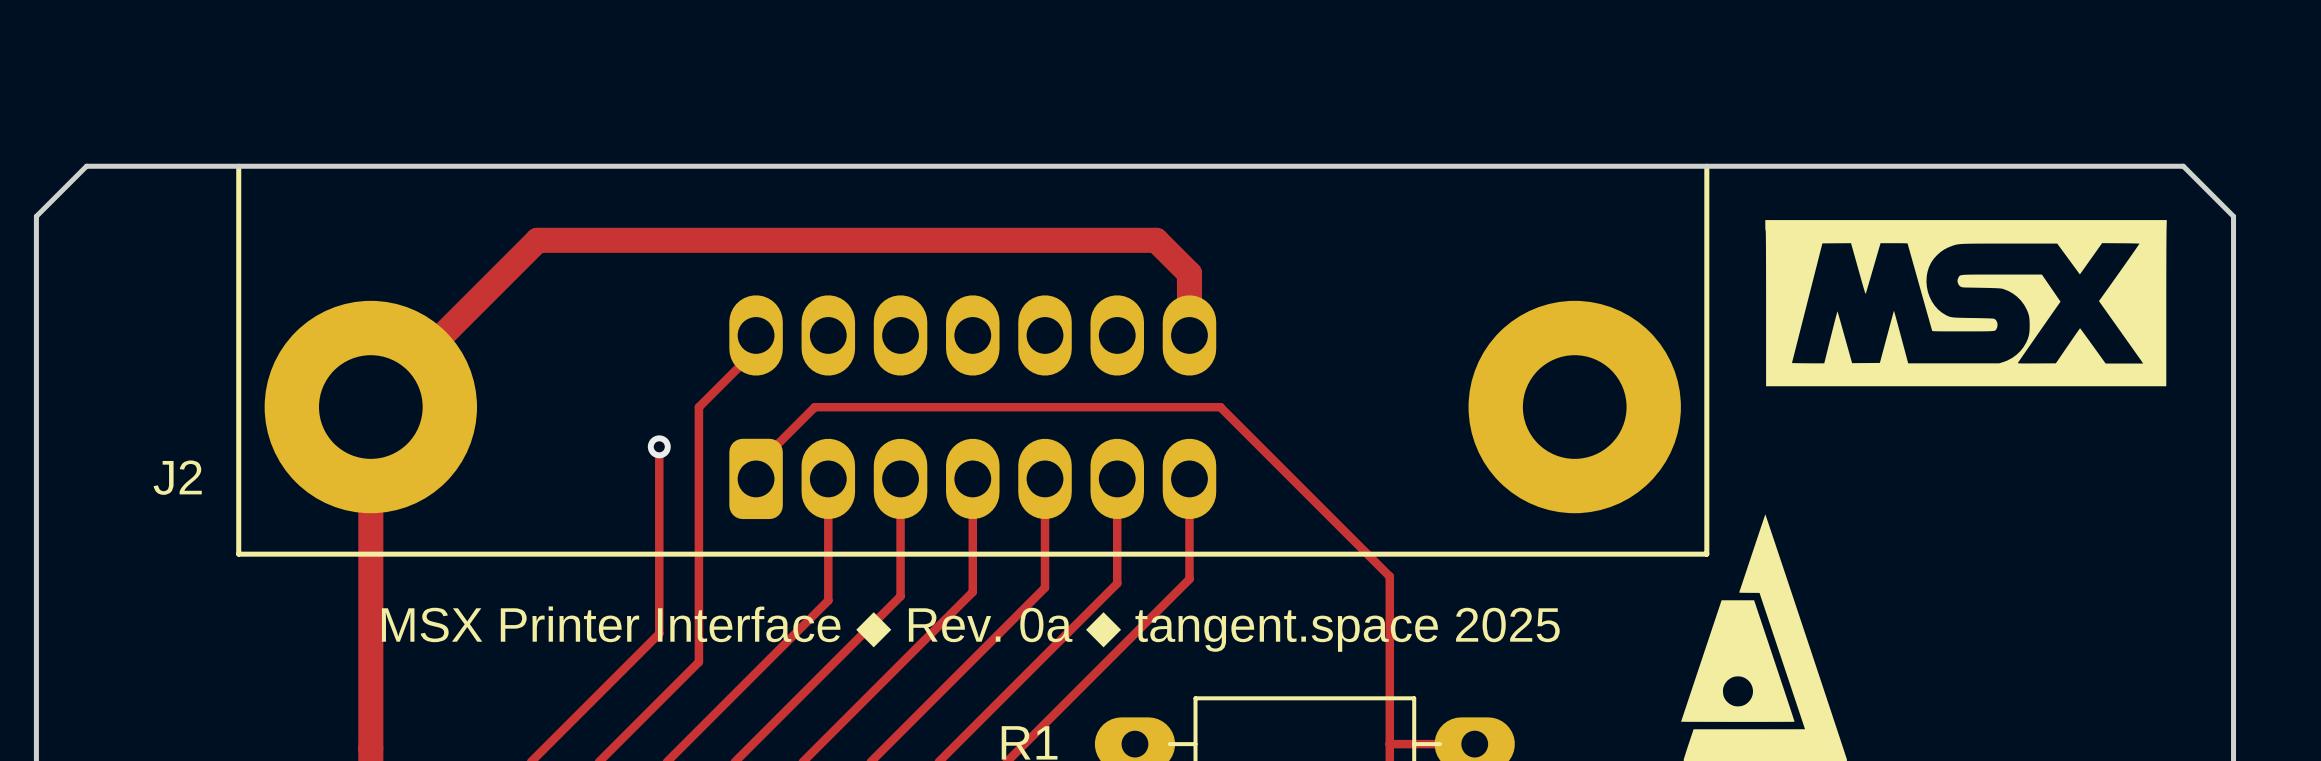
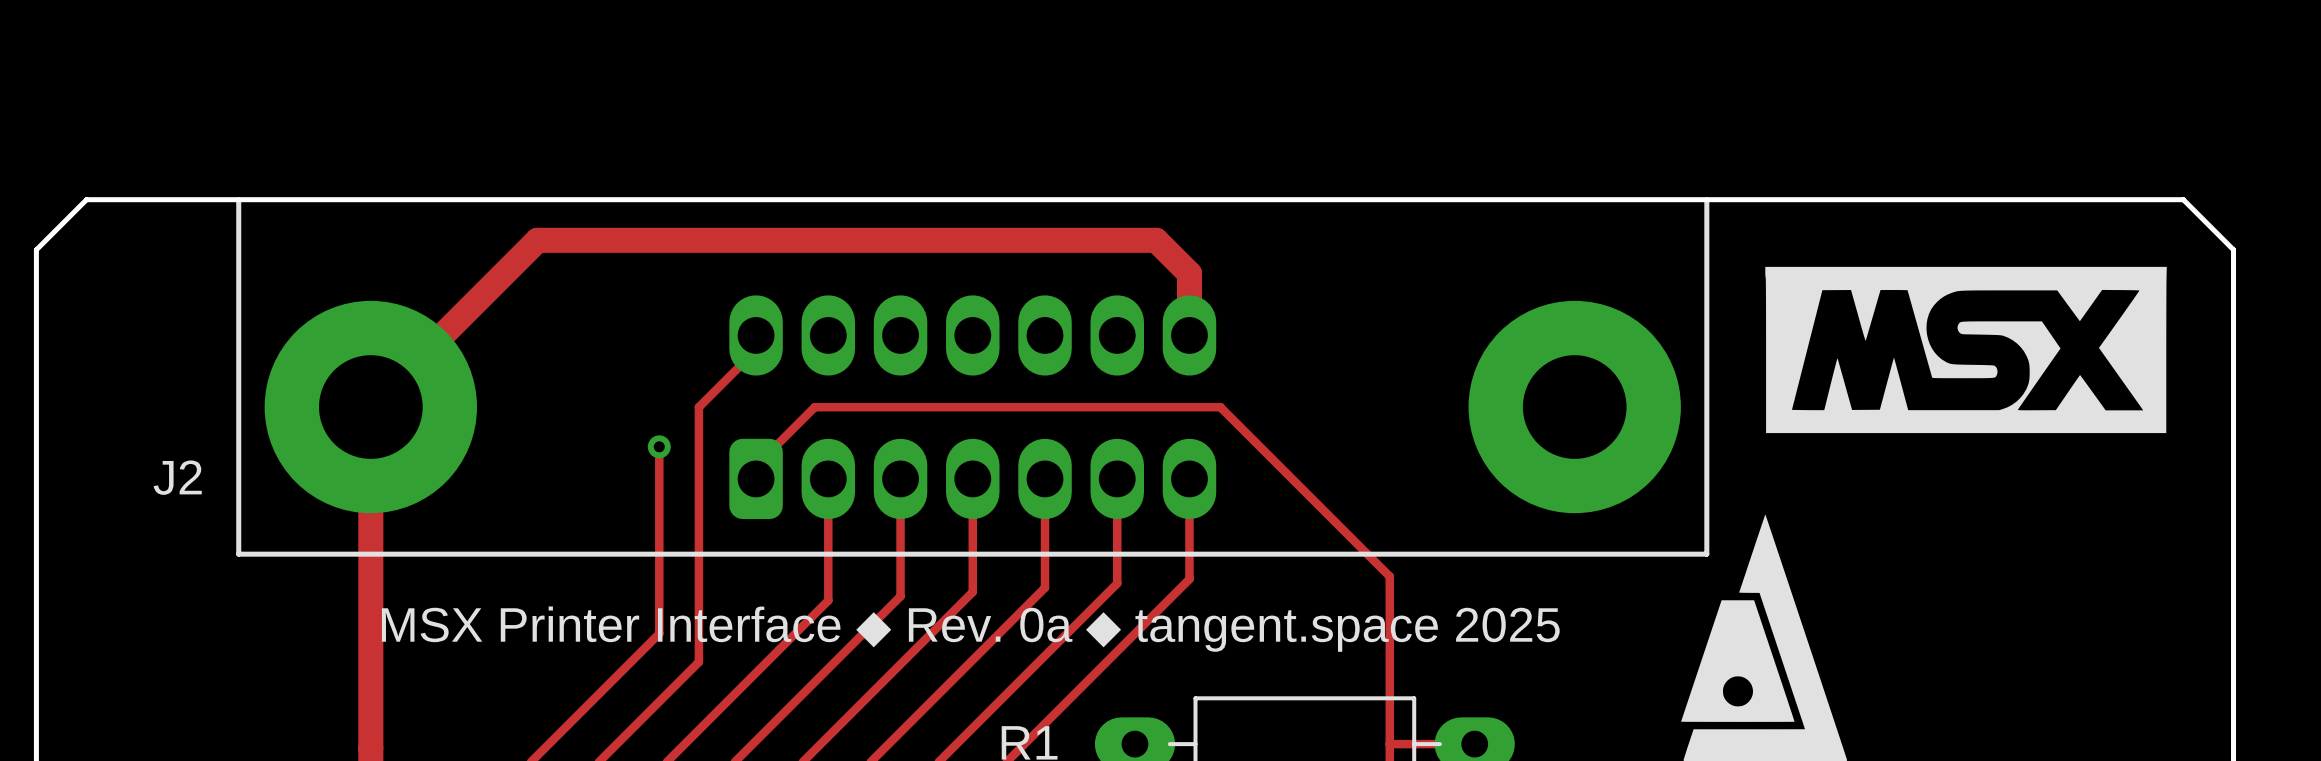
J2 footprint: [236, 163, 1710, 557] -> [236, 197, 1710, 557]
board edge: (36, 249) (36, 216) (86, 166) (2183, 166) (2233, 216) (2233, 249) -> (36, 249) (86, 199) (2183, 199) (2233, 249)
drawing position: (1966, 303) -> (1966, 349)

